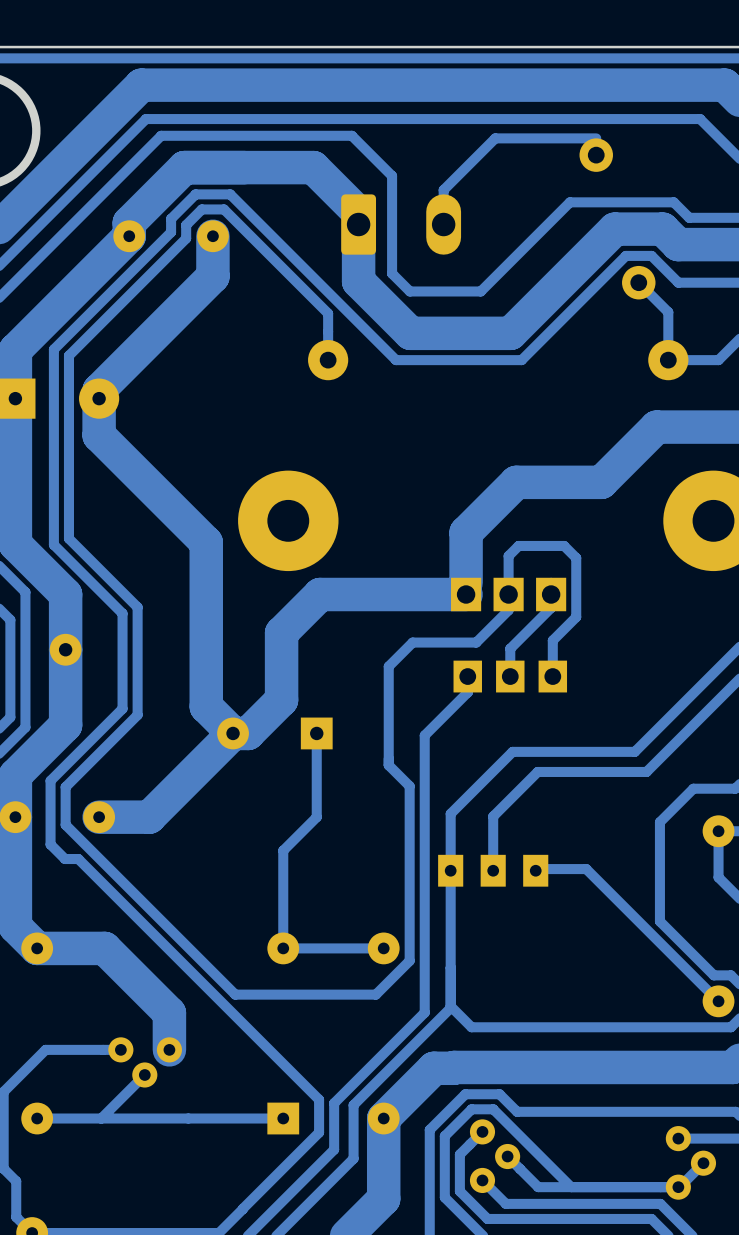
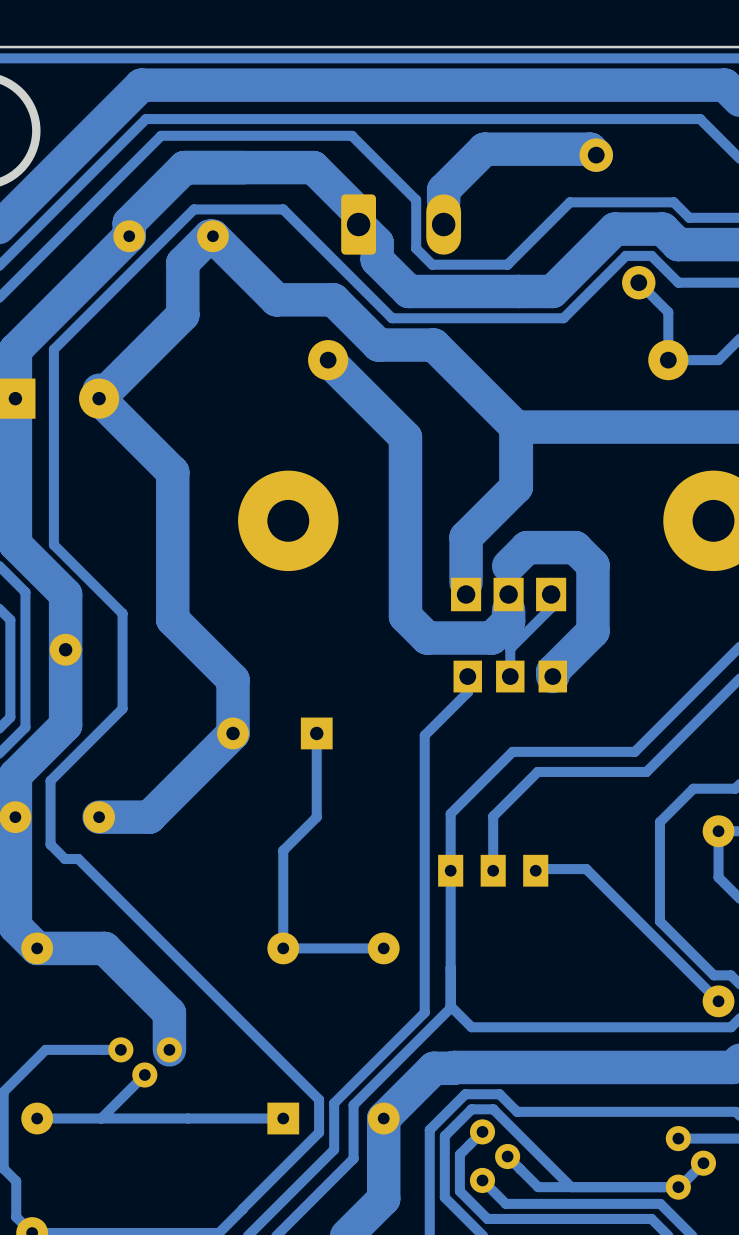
track: (596, 138) (495, 138) (484, 149) -> (596, 155) (590, 149) (484, 149)
track width: thin (484, 149) (443, 190) (443, 202) -> thick (484, 149) (443, 190) (443, 202)
track: (392, 175) (392, 273) (409, 291) -> (358, 224) (377, 243) (377, 259) (409, 291)
track: none -> (392, 175) (416, 200) (416, 248) (432, 264) (507, 264)
track: (201, 209) (186, 225) (186, 238) (68, 355) (68, 538) (137, 607) (137, 715) (65, 787) (65, 824) (235, 994) (375, 994) (409, 960) (409, 786) (388, 765) (388, 666) (412, 642) (476, 642) (508, 610) -> (328, 360) (405, 437) (405, 616) (427, 638) (491, 638) (508, 621) (508, 610)
track: none -> (201, 209) (193, 209) (171, 232)
track: (224, 209) (328, 313) (328, 360) -> none
track: (358, 224) (358, 281) (410, 333) (510, 333) (552, 291) -> none
track: (171, 232) (171, 218) (195, 194) (230, 194) (396, 360) (521, 360) (563, 318) -> (224, 209) (283, 209) (392, 318) (563, 318)
track: (212, 236) (212, 276) (99, 390) -> none
track: (507, 264) (480, 291) -> (552, 291) (480, 291)
track width: thin (480, 291) (409, 291) -> thick (480, 291) (409, 291)
track: (99, 398) (99, 435) (206, 542) (206, 706) (233, 733) (248, 733) (281, 699) (281, 633) (320, 594) (466, 594) -> none
track: none -> (516, 427) (433, 345) (378, 345) (333, 299) (276, 299) (212, 236) (209, 236) (182, 263) (182, 314) (99, 398) (172, 472) (172, 619) (233, 679) (233, 733)
track: (656, 427) (601, 482) (516, 482) (466, 532) (466, 537) -> (656, 427) (516, 427) (516, 487) (466, 537)
track: (508, 566) (508, 556) (518, 545) (564, 545) (576, 558) (576, 617) (552, 640) (552, 666) -> (508, 566) (527, 547) (575, 547) (592, 565) (592, 631) (552, 671) (552, 676)

